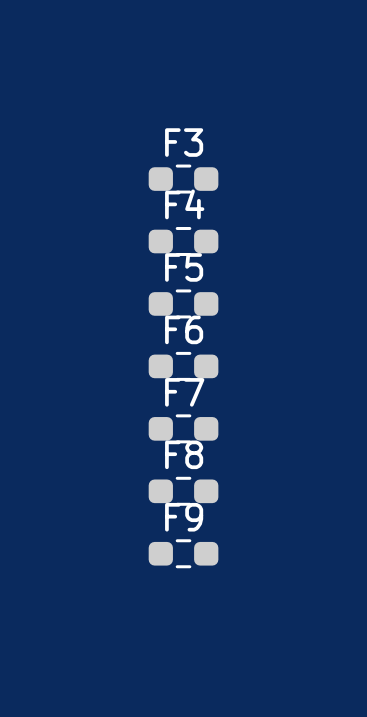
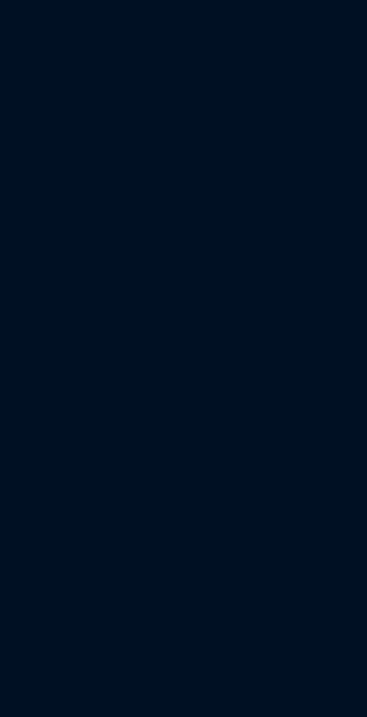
F3: (183, 179) -> none
F4: (183, 241) -> none
F5: (183, 303) -> none
F6: (183, 366) -> none
F7: (183, 428) -> none
F8: (183, 491) -> none
F9: (183, 553) -> none

